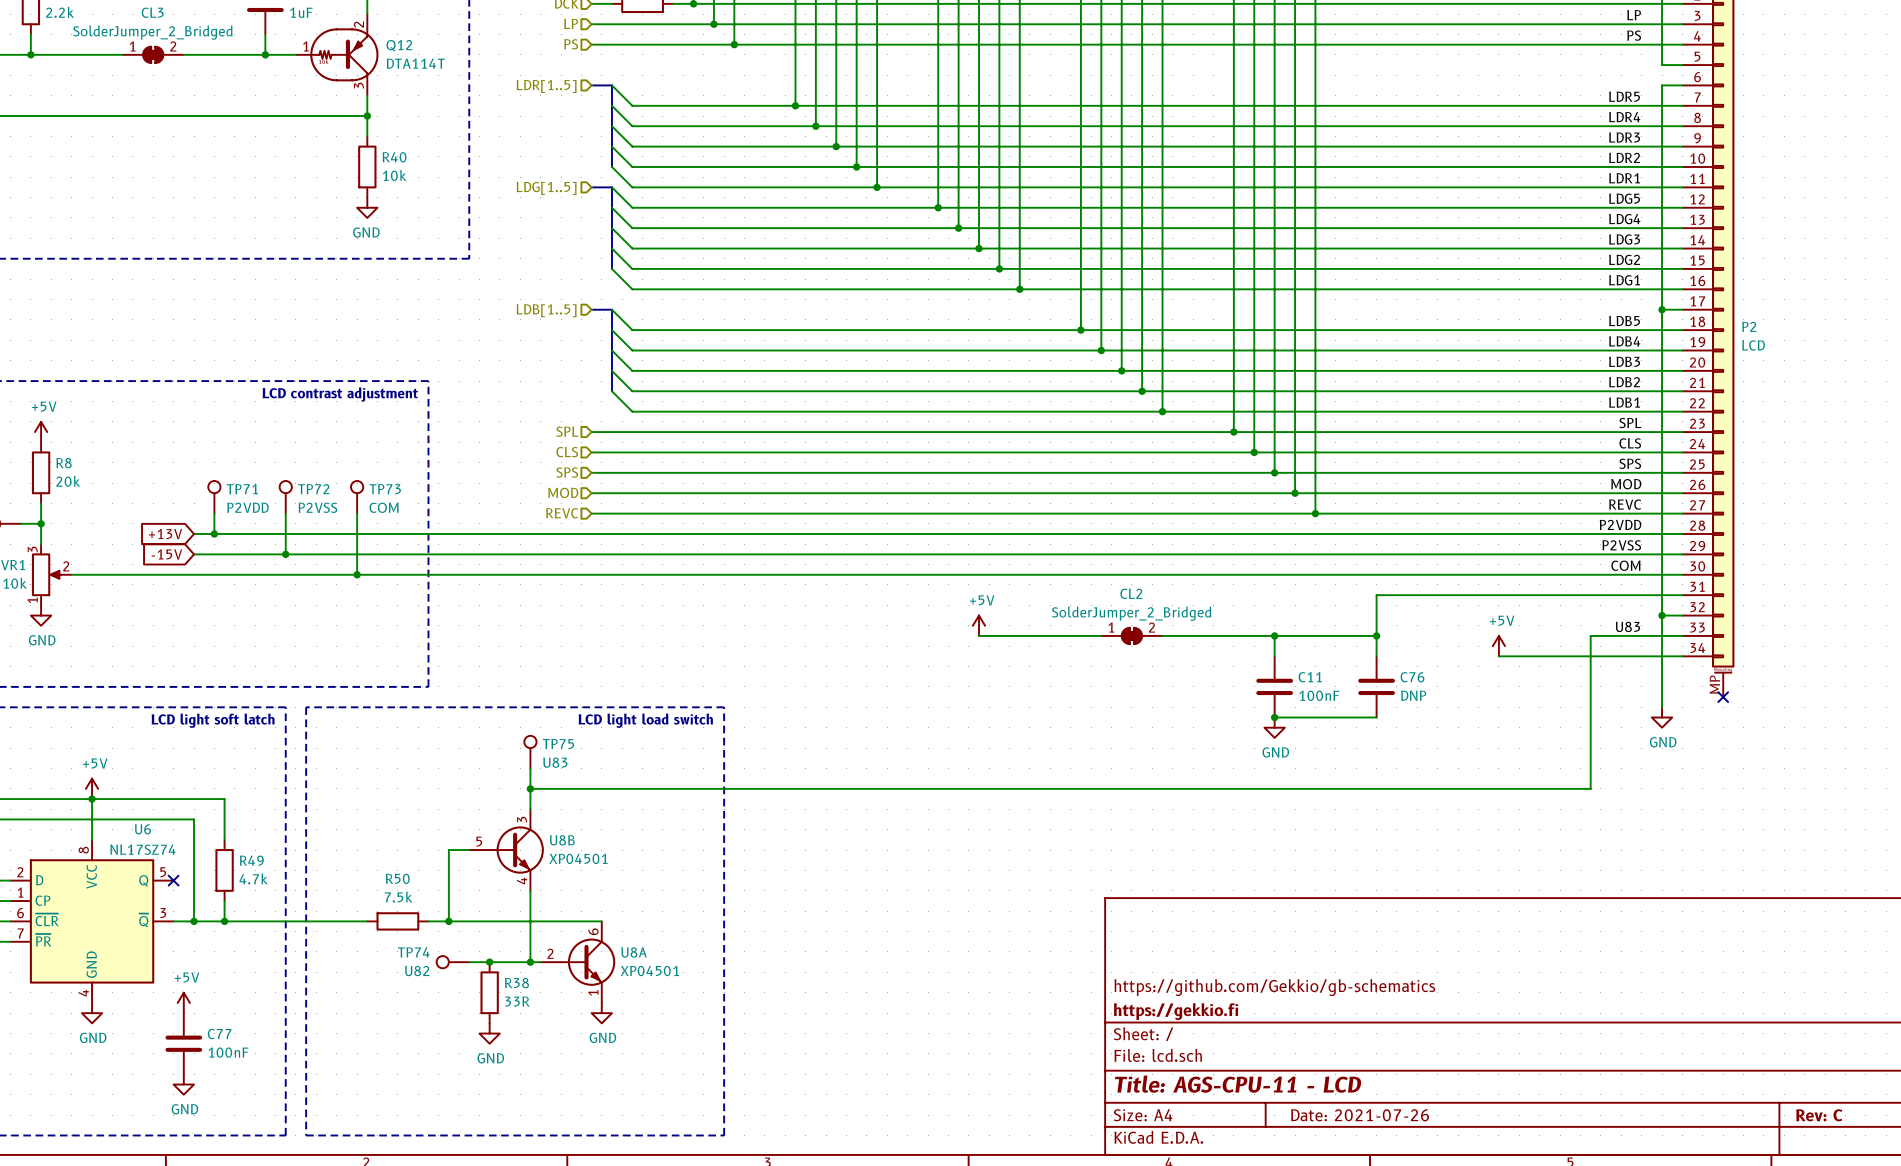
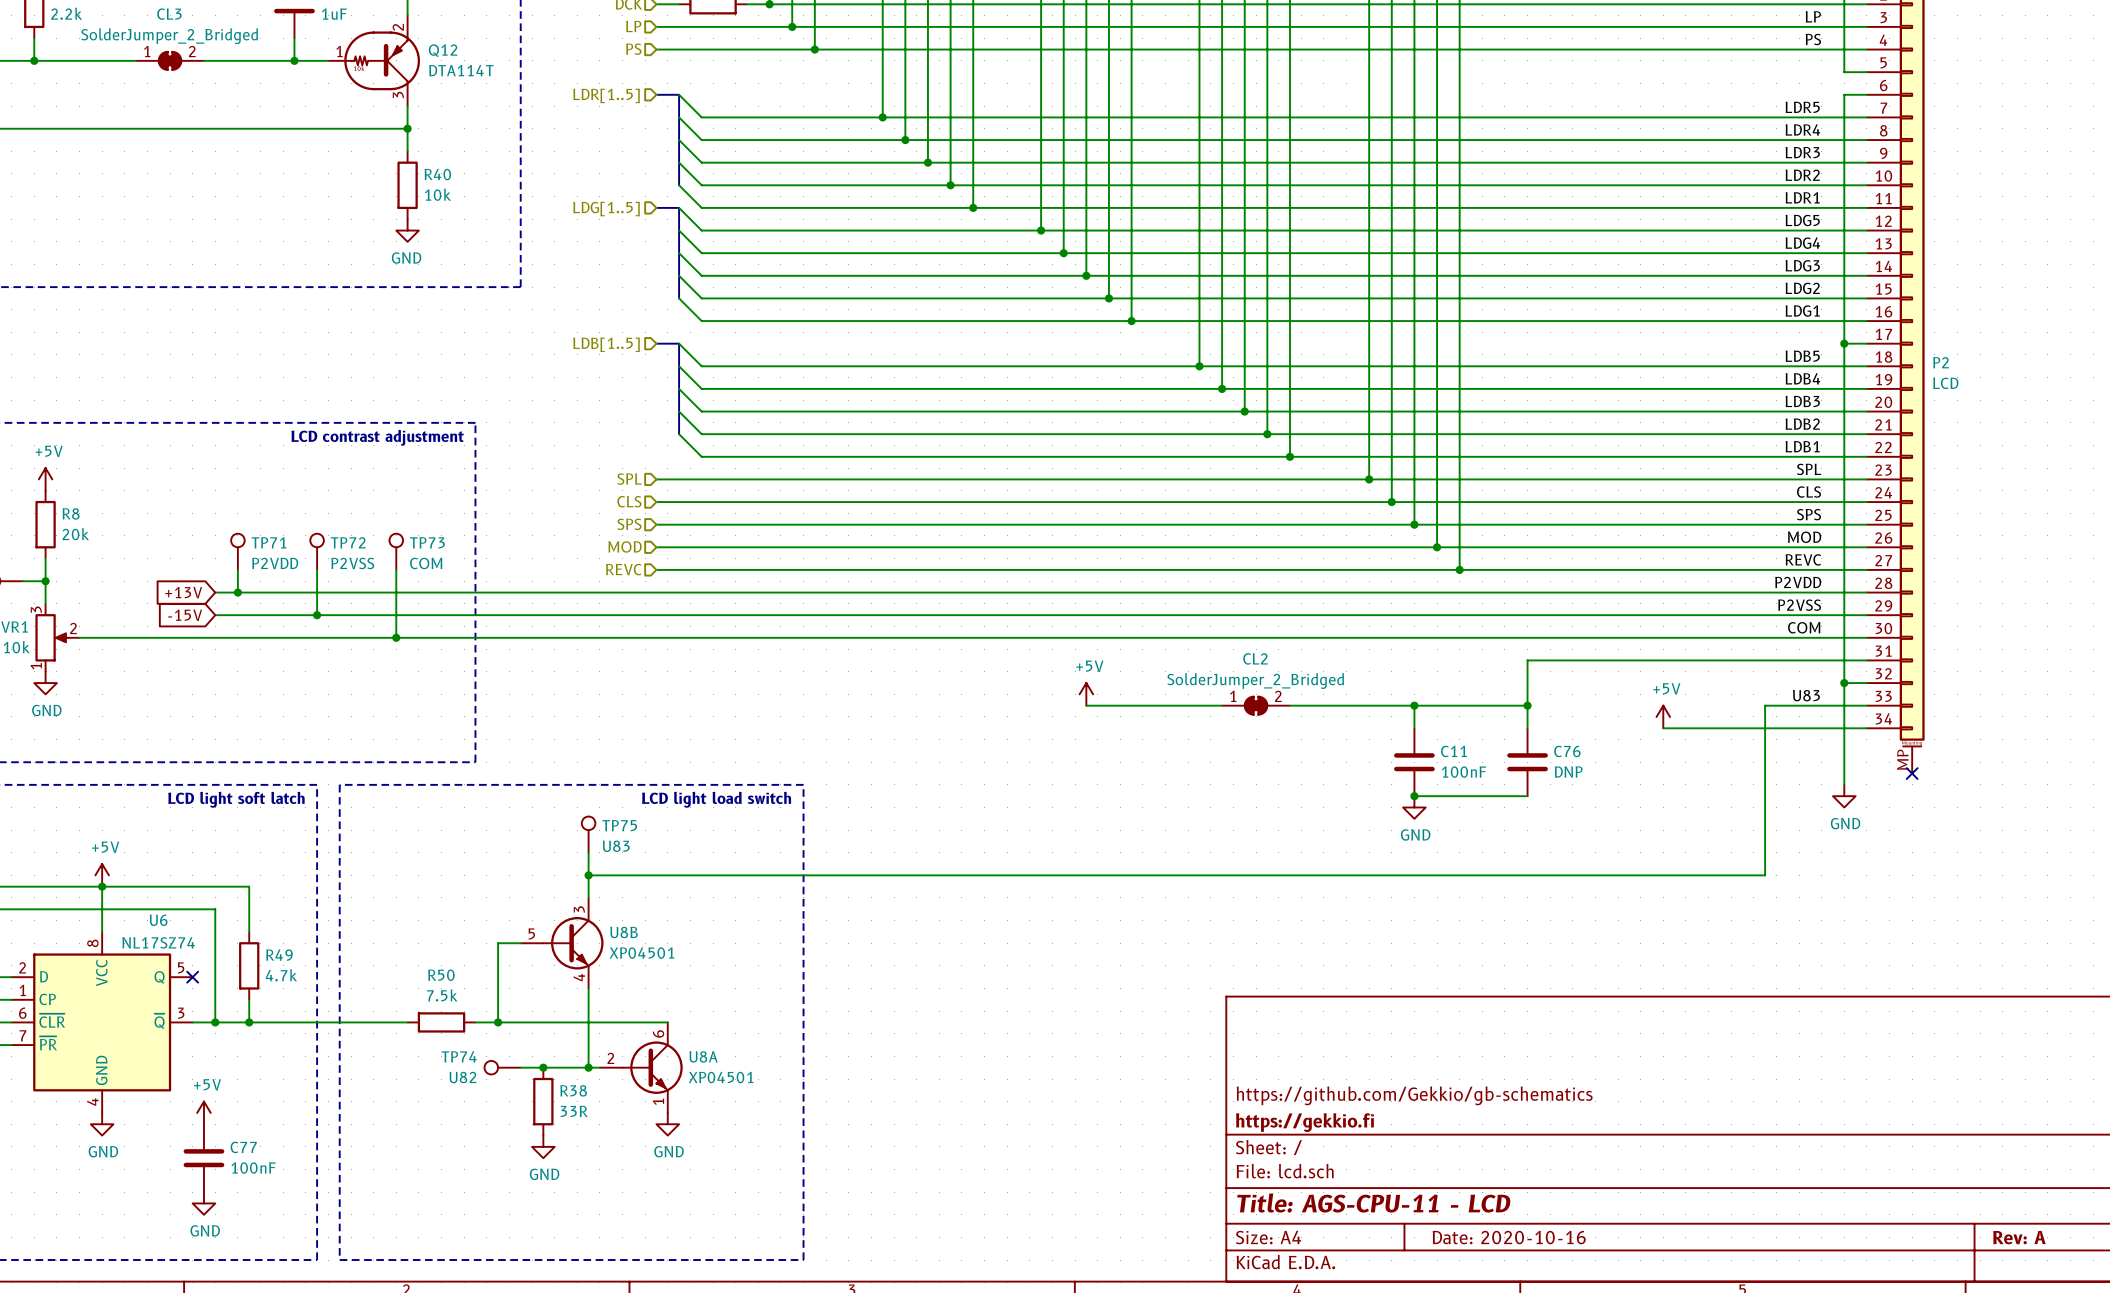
title block: Date: 2021-07-26 (1360, 1115) -> Date: 2020-10-16 (1509, 1237)
title block: Rev: C (1819, 1115) -> Rev: A (2019, 1237)

